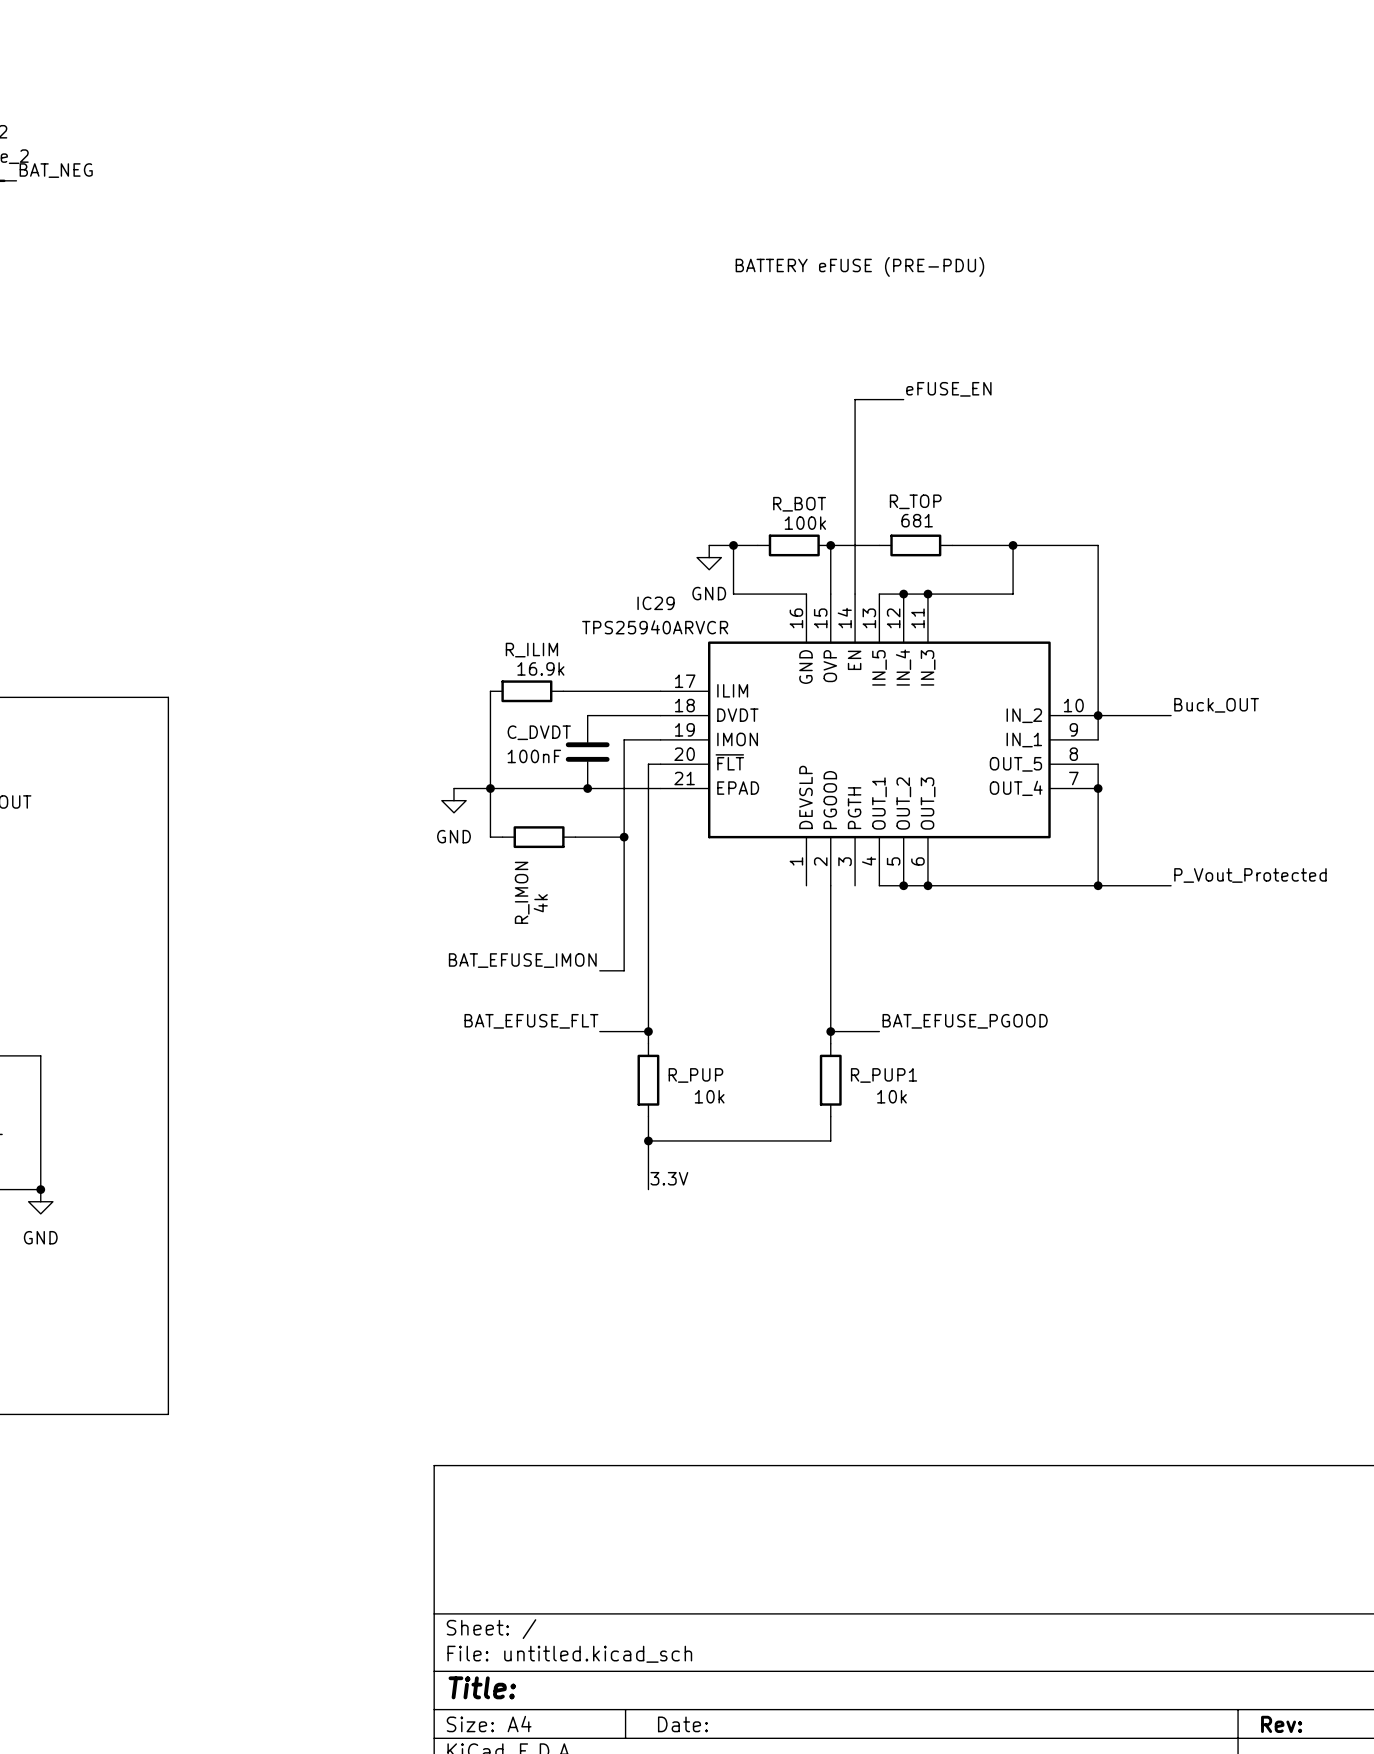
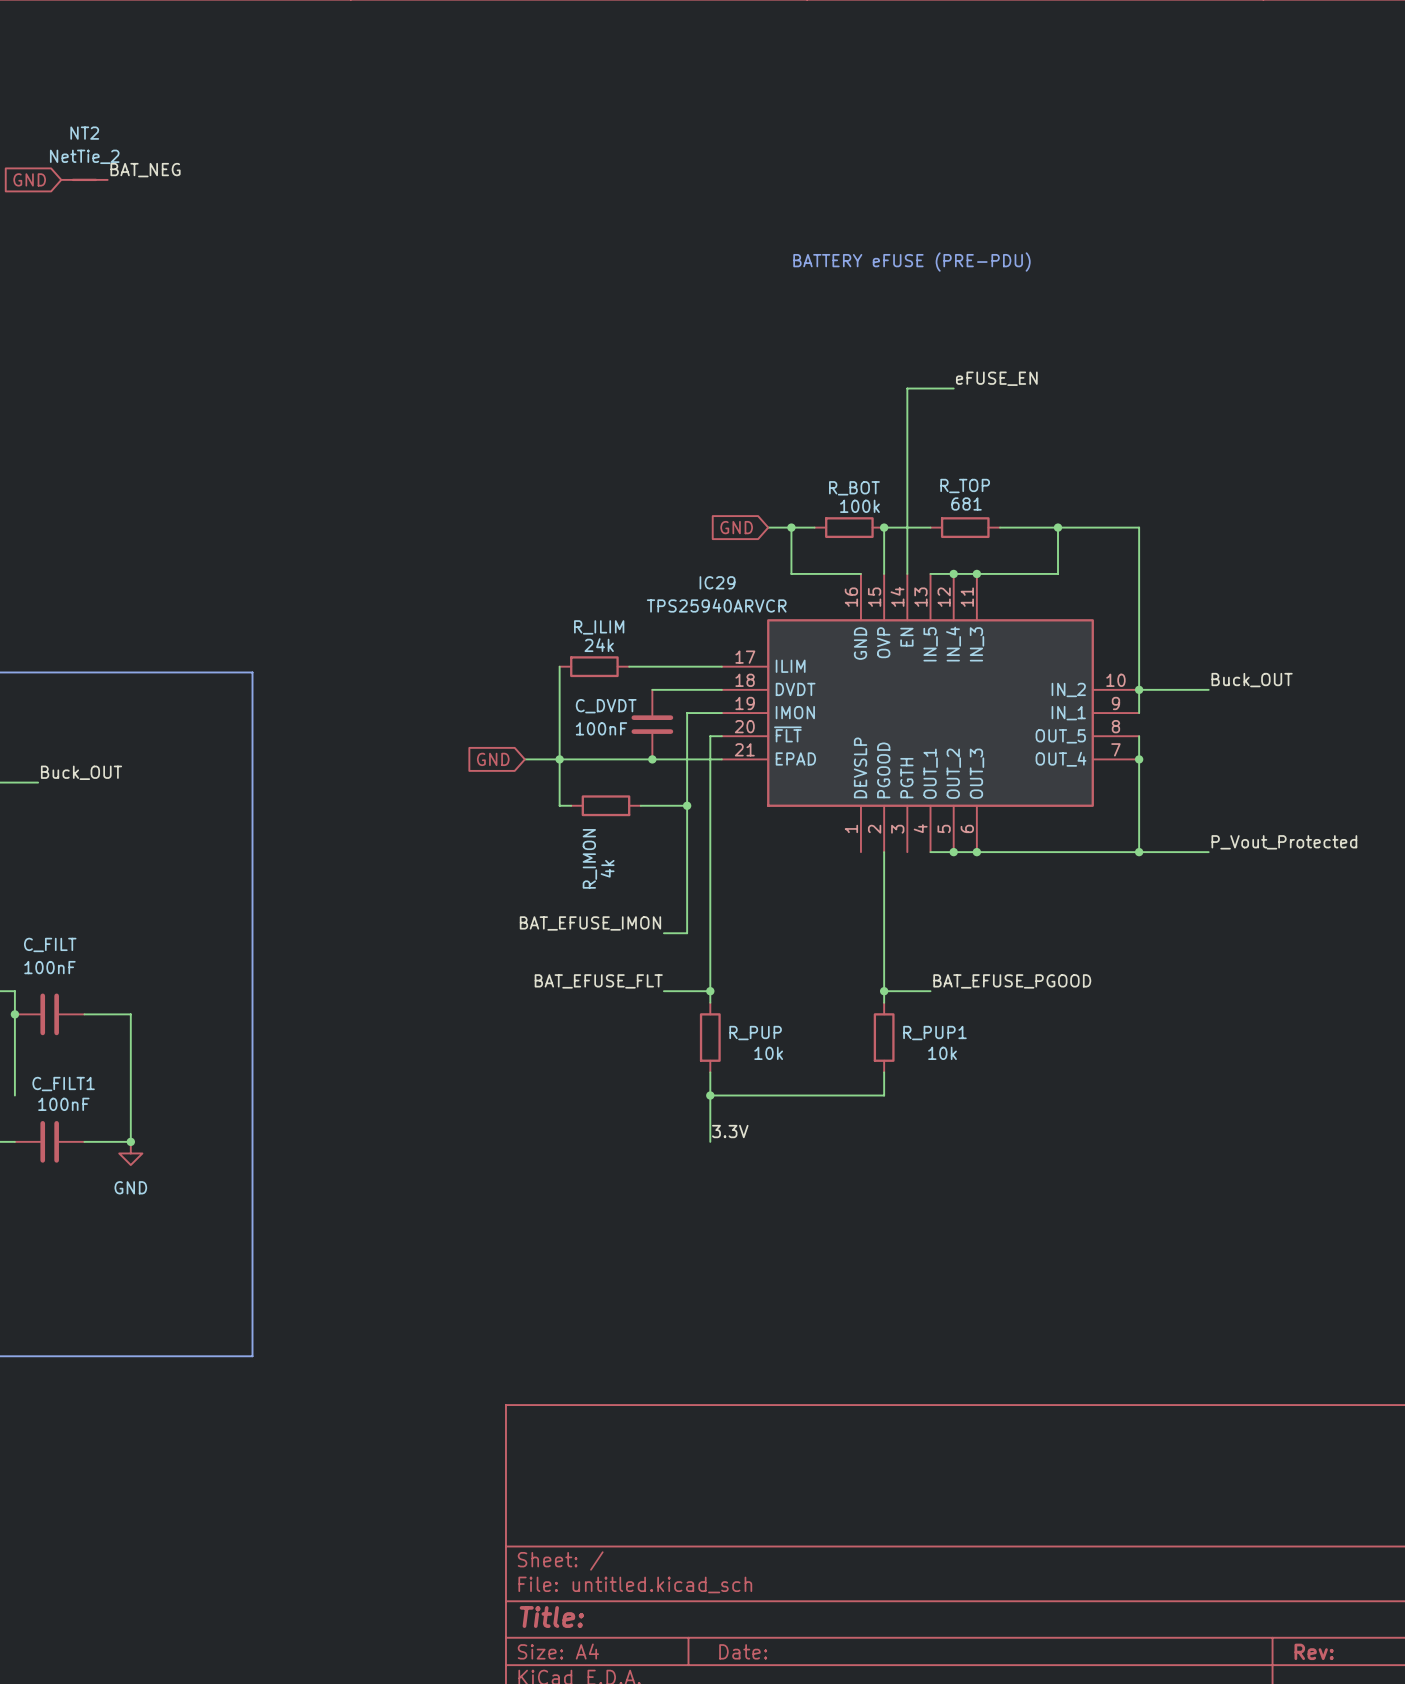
global label: none -> GND (736, 527)
power symbol: GND (709, 557) -> none
R_ILIM value: 16.9k (540, 668) -> 24k (599, 645)
global label: none -> GND (493, 759)
power symbol: GND (453, 800) -> none

